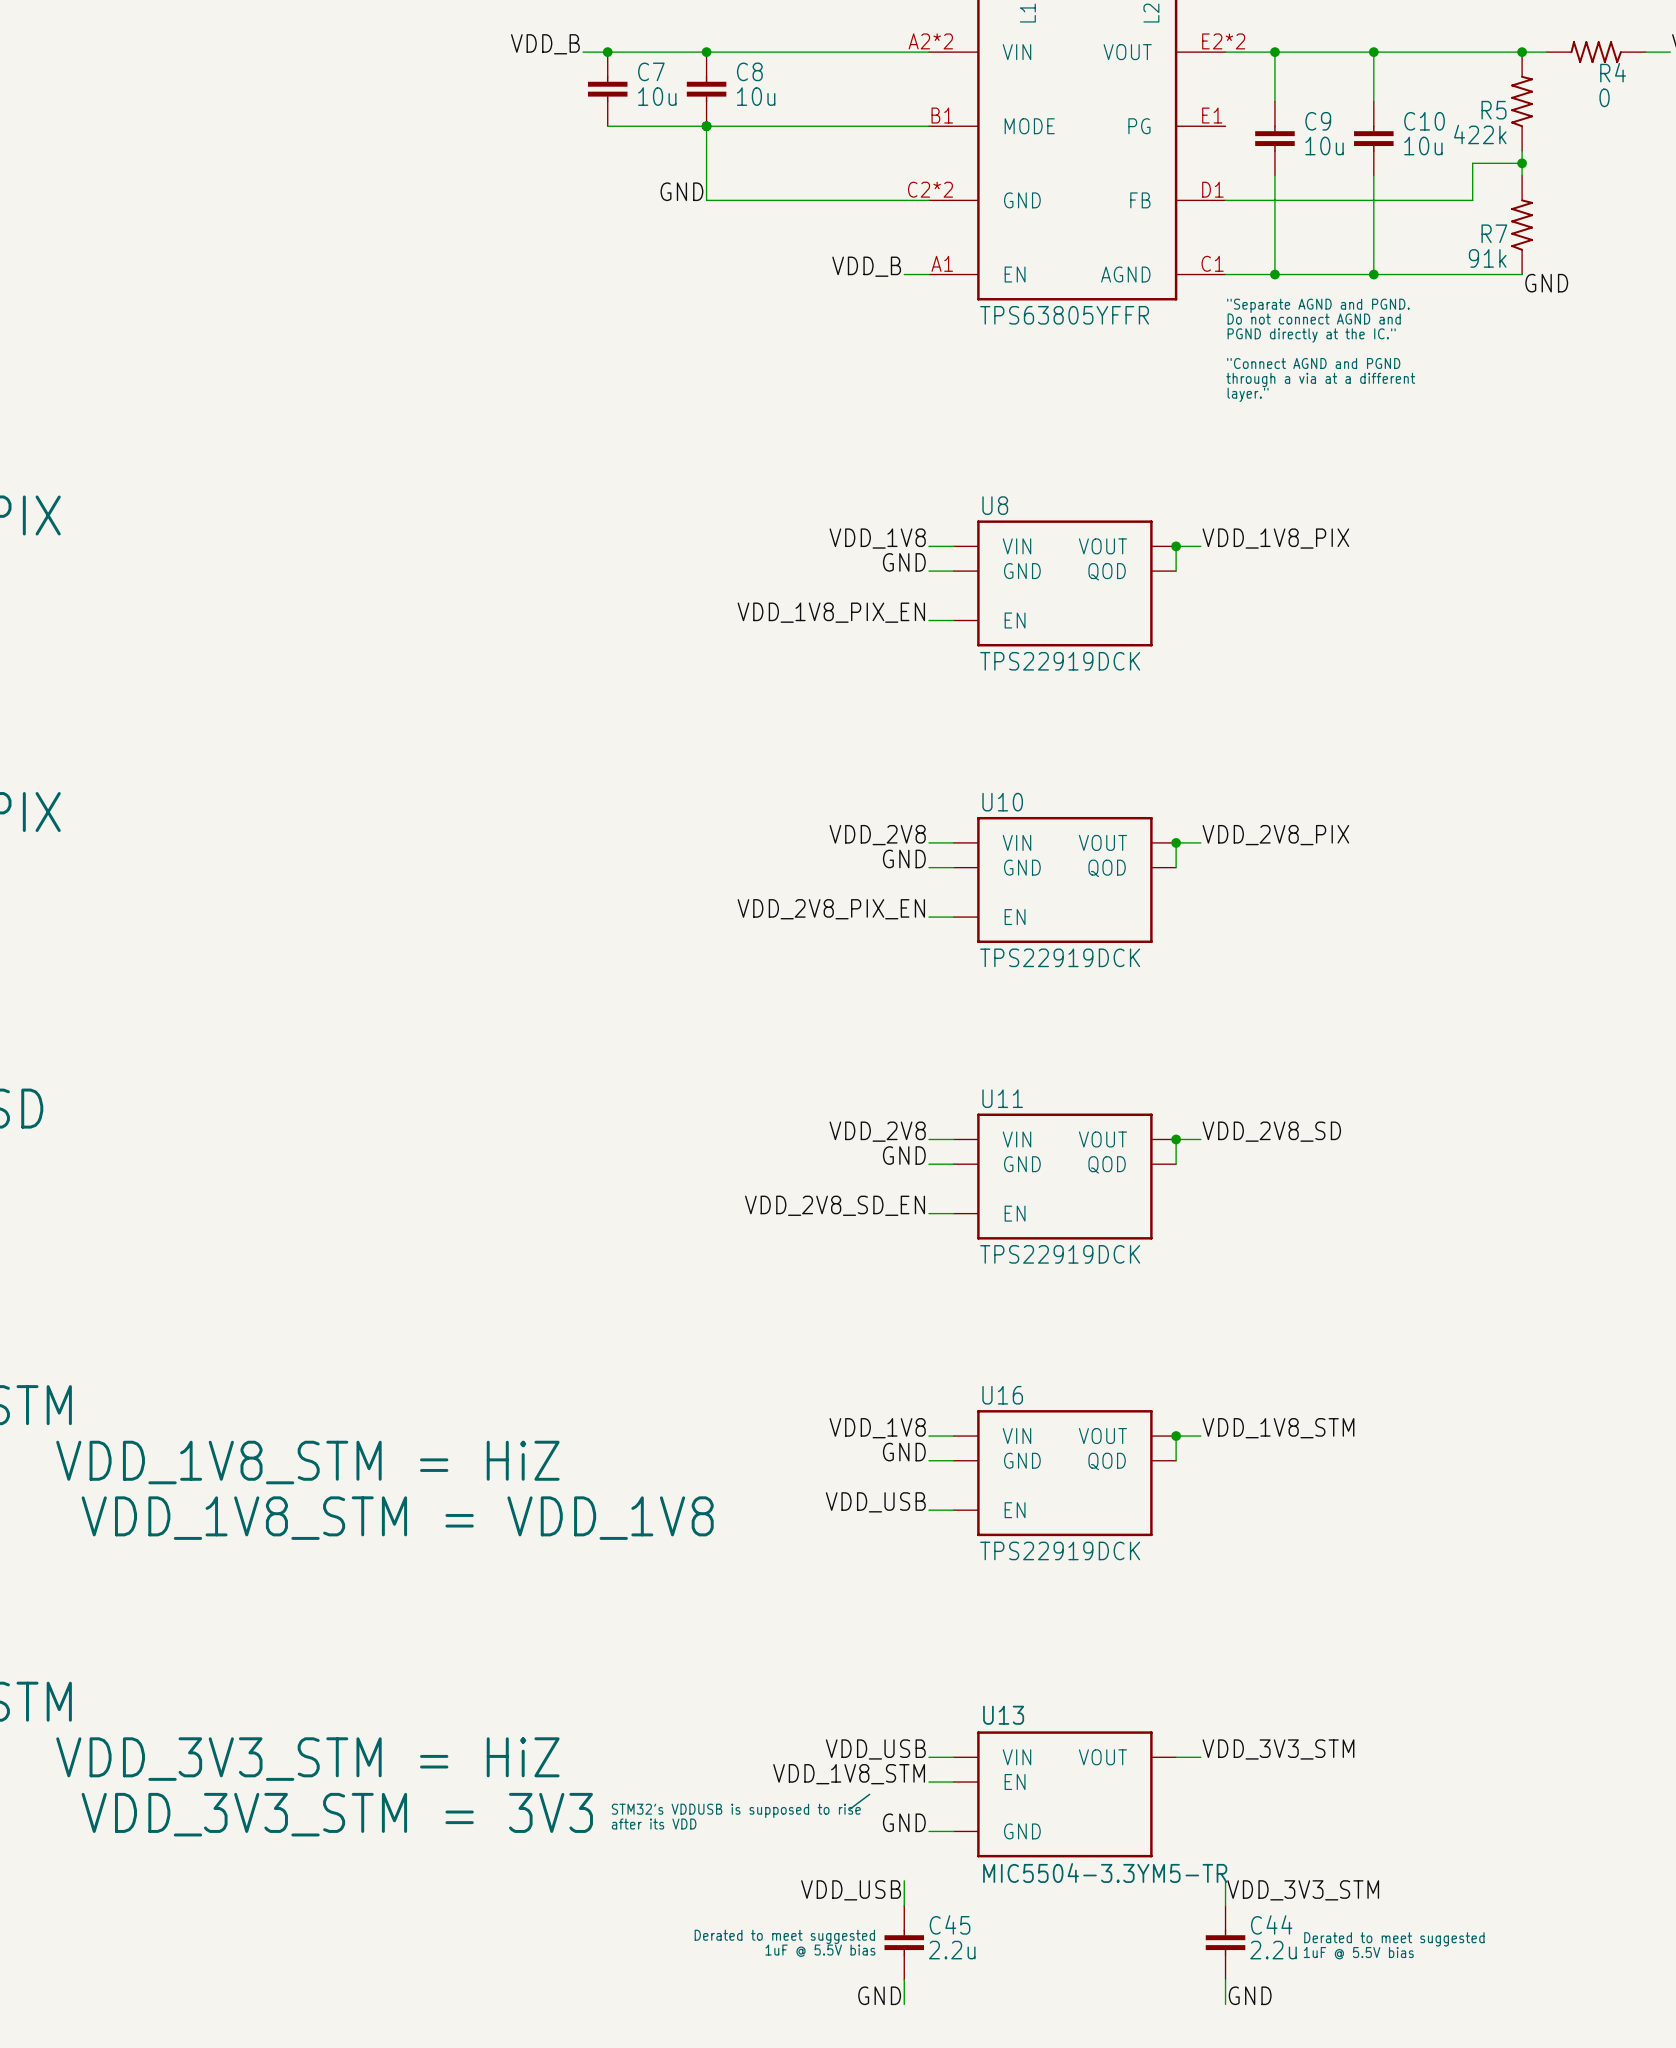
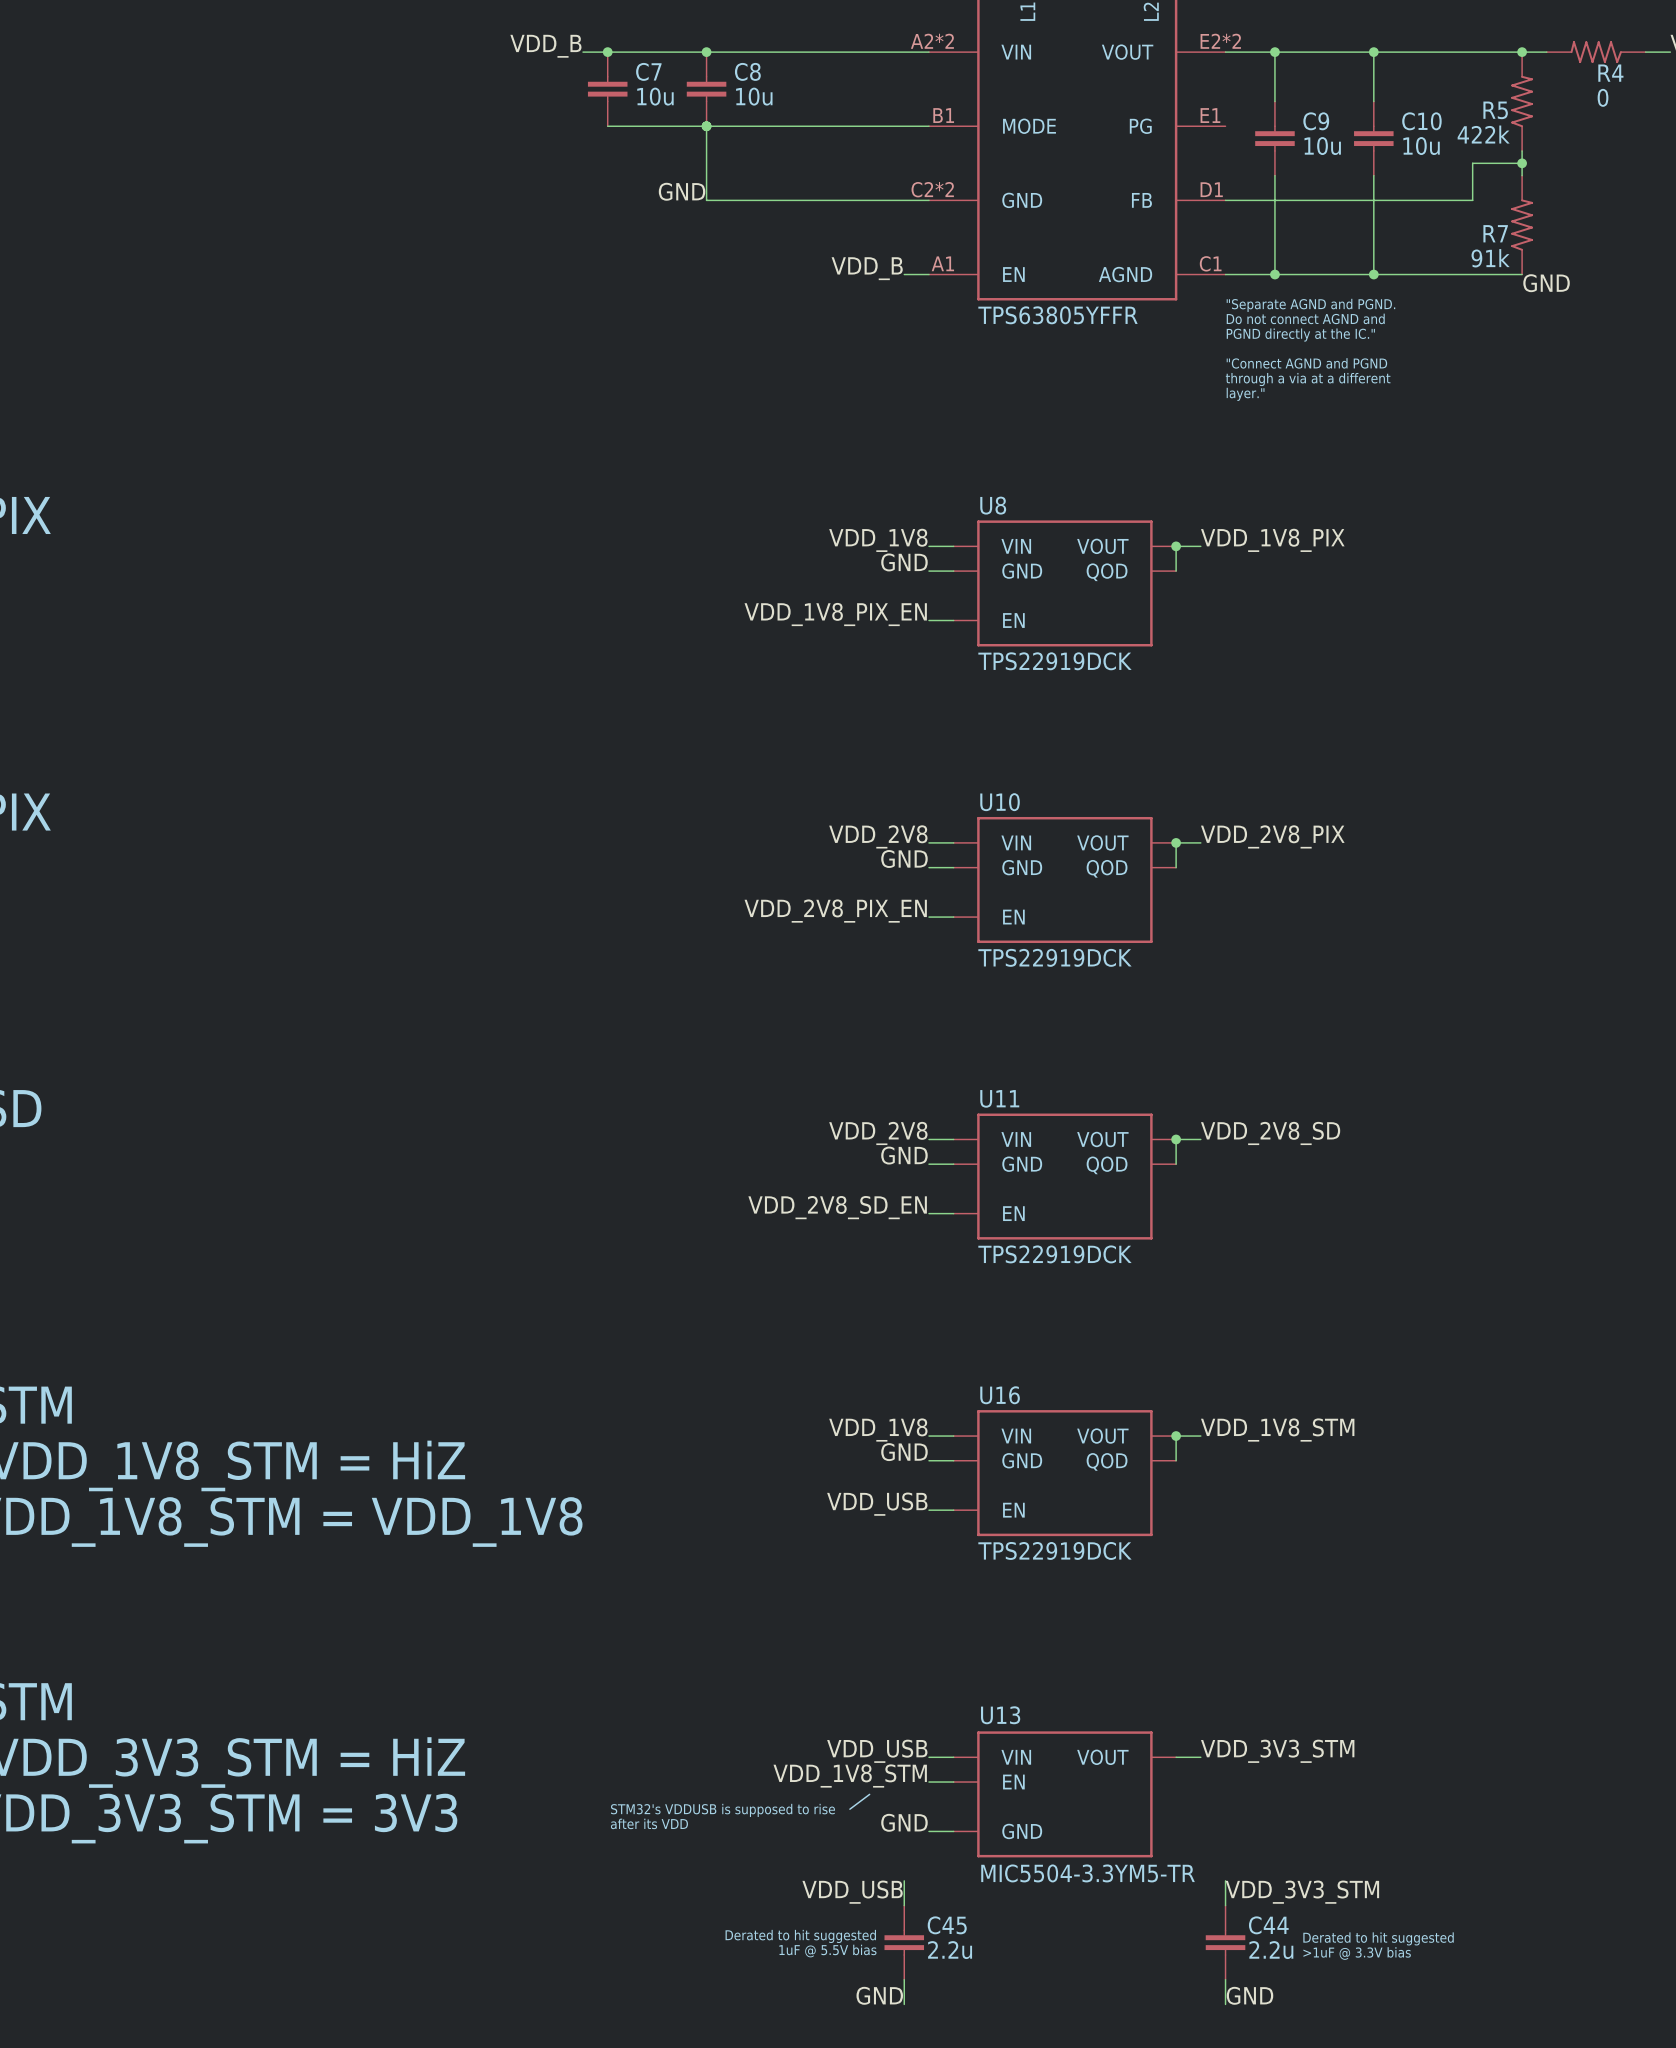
text: Derated to meet suggested (784, 1936) -> Derated to hit suggested (800, 1936)
text: Derated to meet suggested (1394, 1939) -> Derated to hit suggested (1378, 1938)
text: 1uF @ 5.5V bias (1358, 1953) -> >1uF @ 3.3V bias (1357, 1953)

